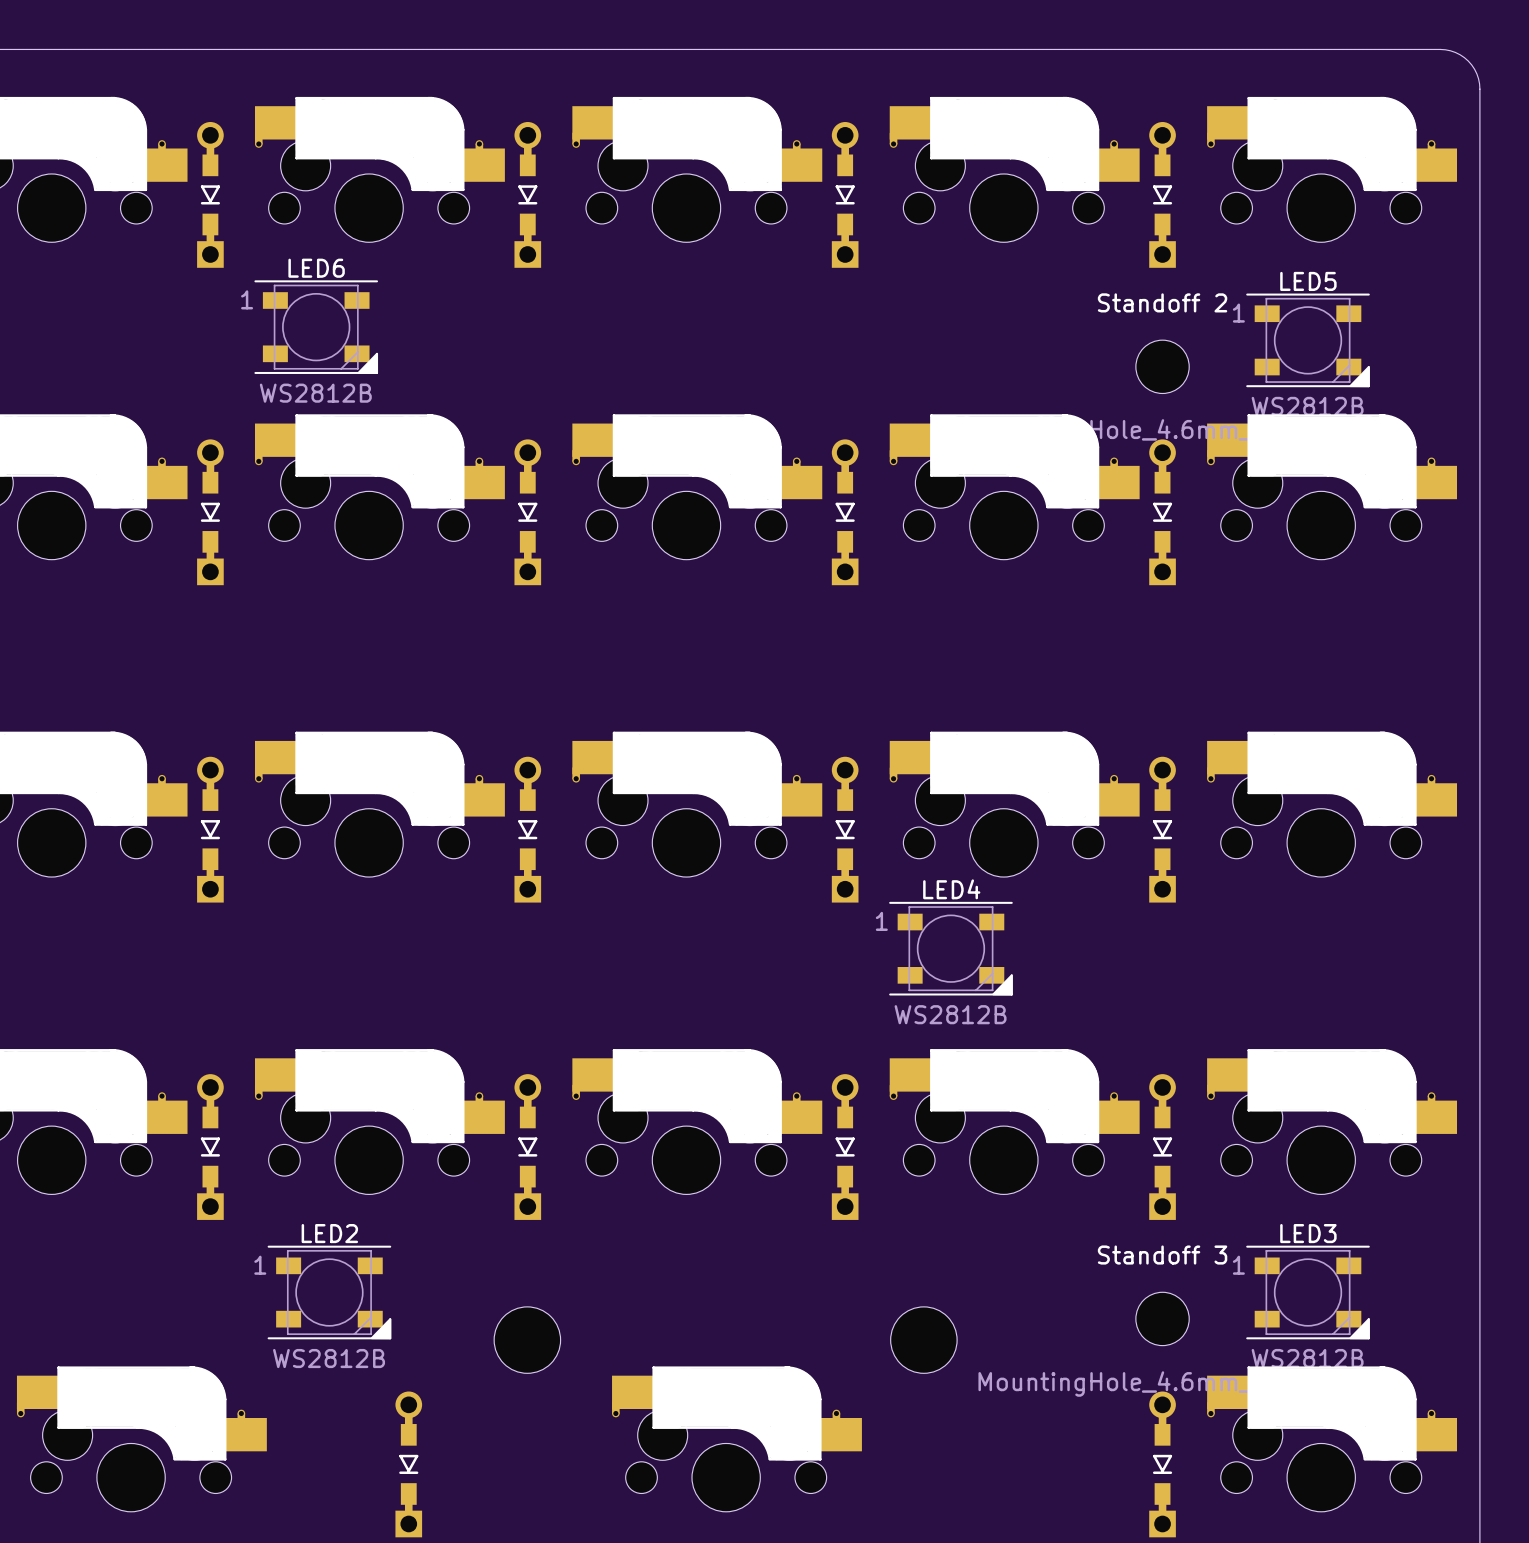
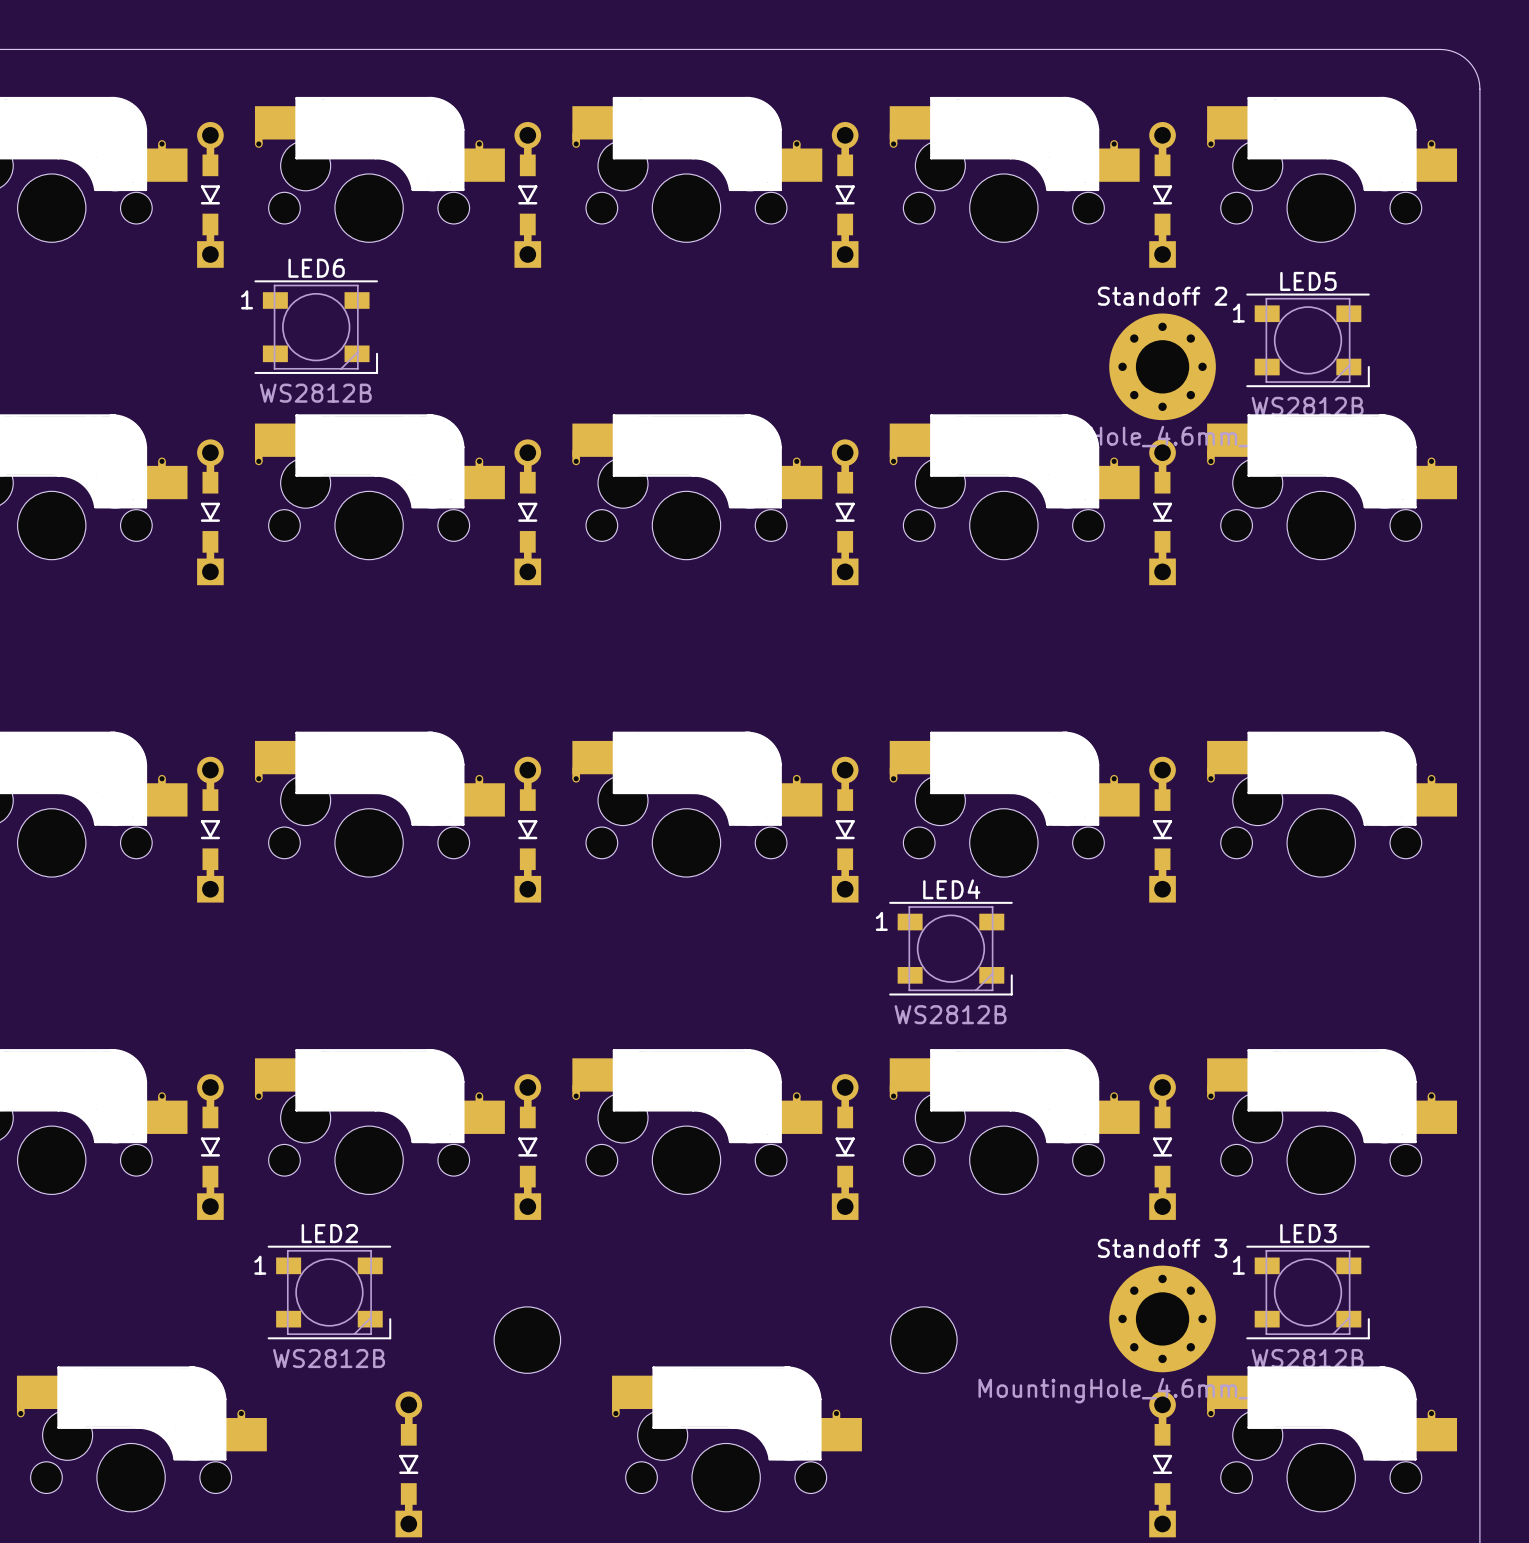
LED6 footprint: [254, 280, 379, 374] -> [254, 280, 379, 374]
LED5 footprint: [1246, 293, 1370, 388] -> [1246, 293, 1370, 388]
Standoff 2 footprint: [1135, 340, 1190, 394] -> [1109, 313, 1216, 421]
LED4 footprint: [889, 901, 1013, 996] -> [889, 901, 1013, 996]
LED2 footprint: [267, 1245, 392, 1340] -> [267, 1245, 392, 1340]
LED3 footprint: [1246, 1245, 1370, 1340] -> [1246, 1245, 1370, 1340]
Standoff 3 footprint: [1135, 1292, 1190, 1346] -> [1109, 1265, 1216, 1373]

